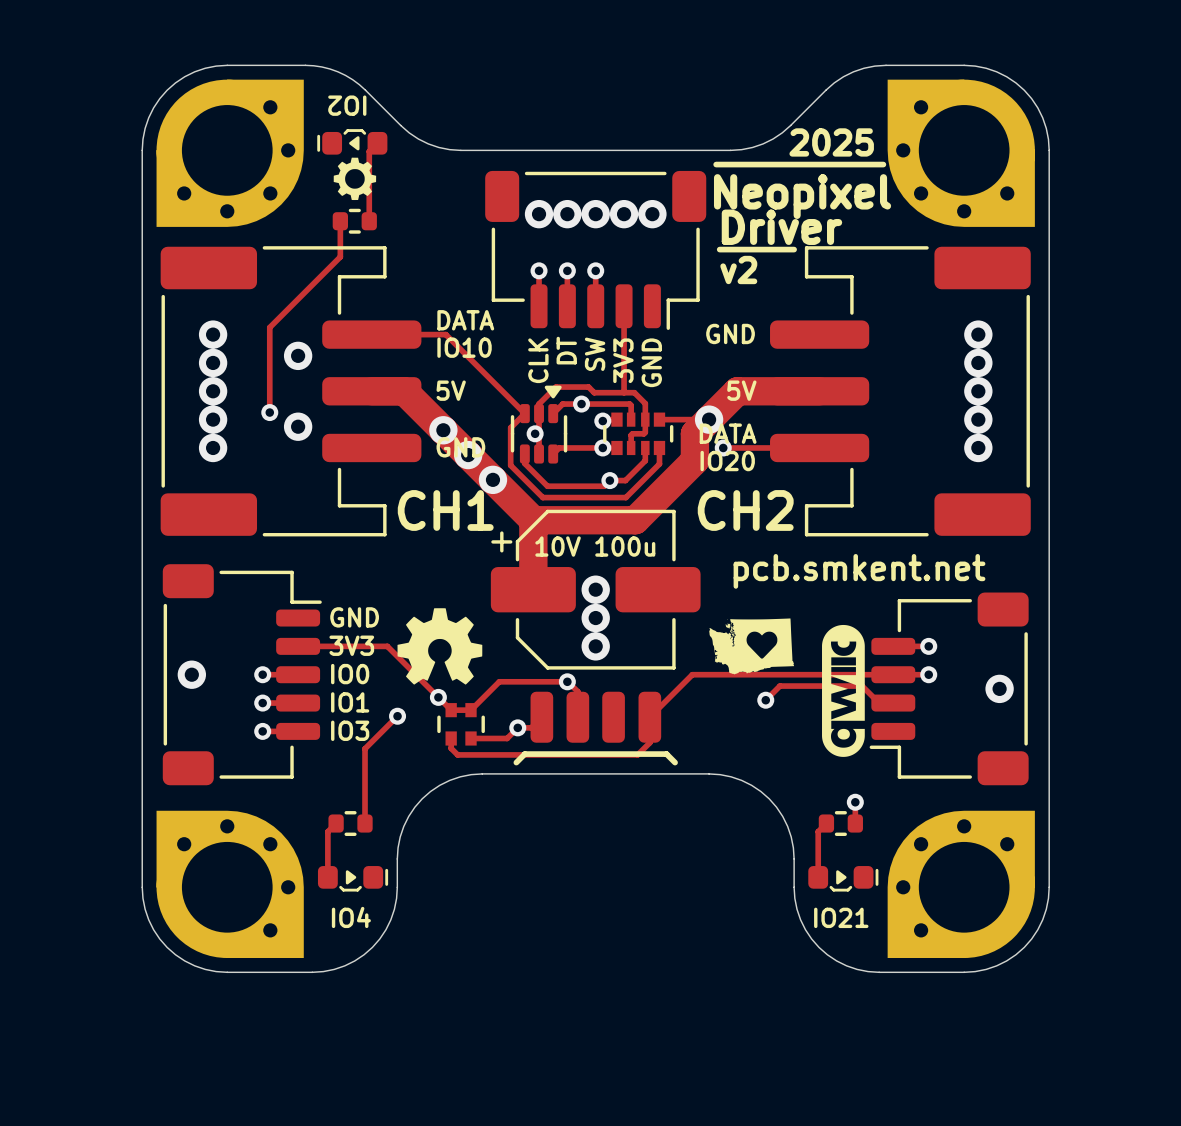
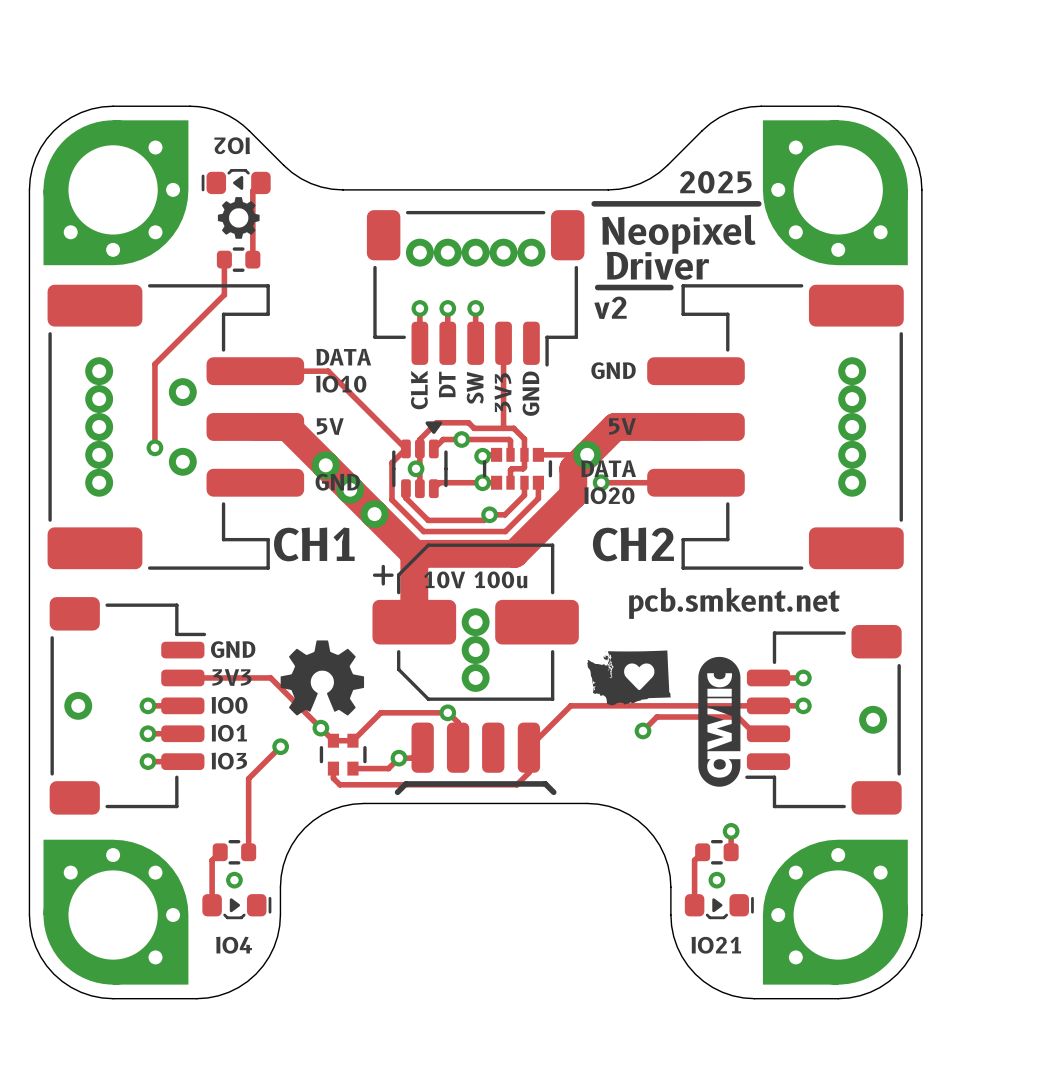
via: none -> (234, 880)
via: none -> (716, 880)

